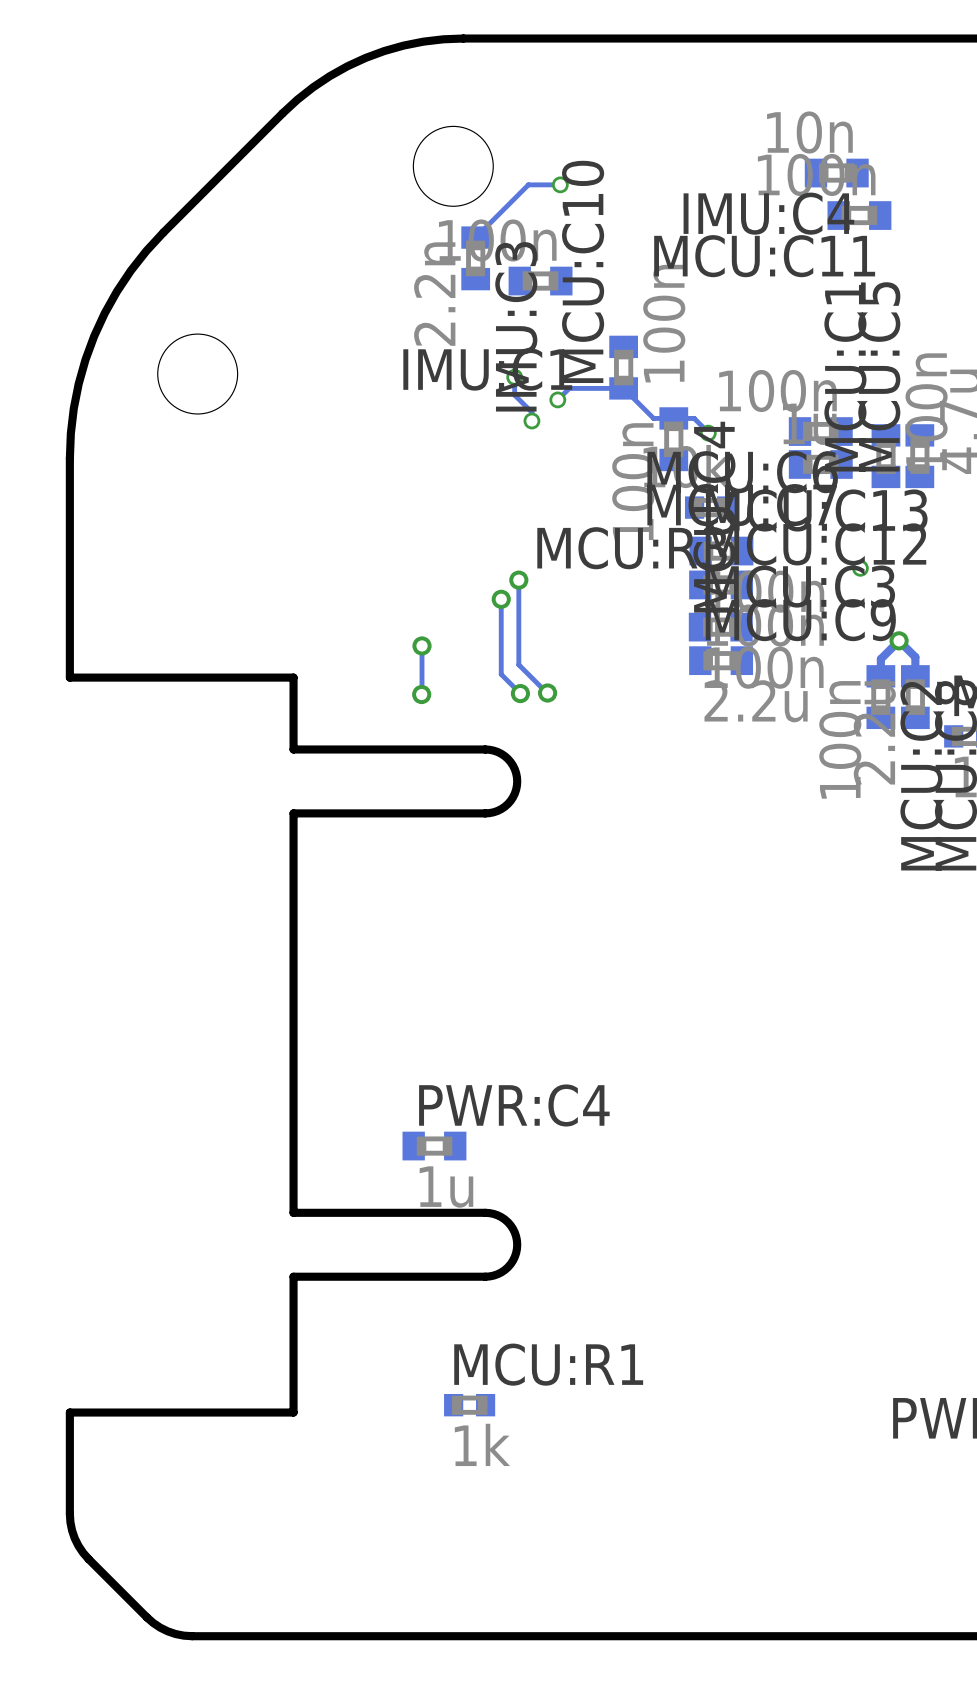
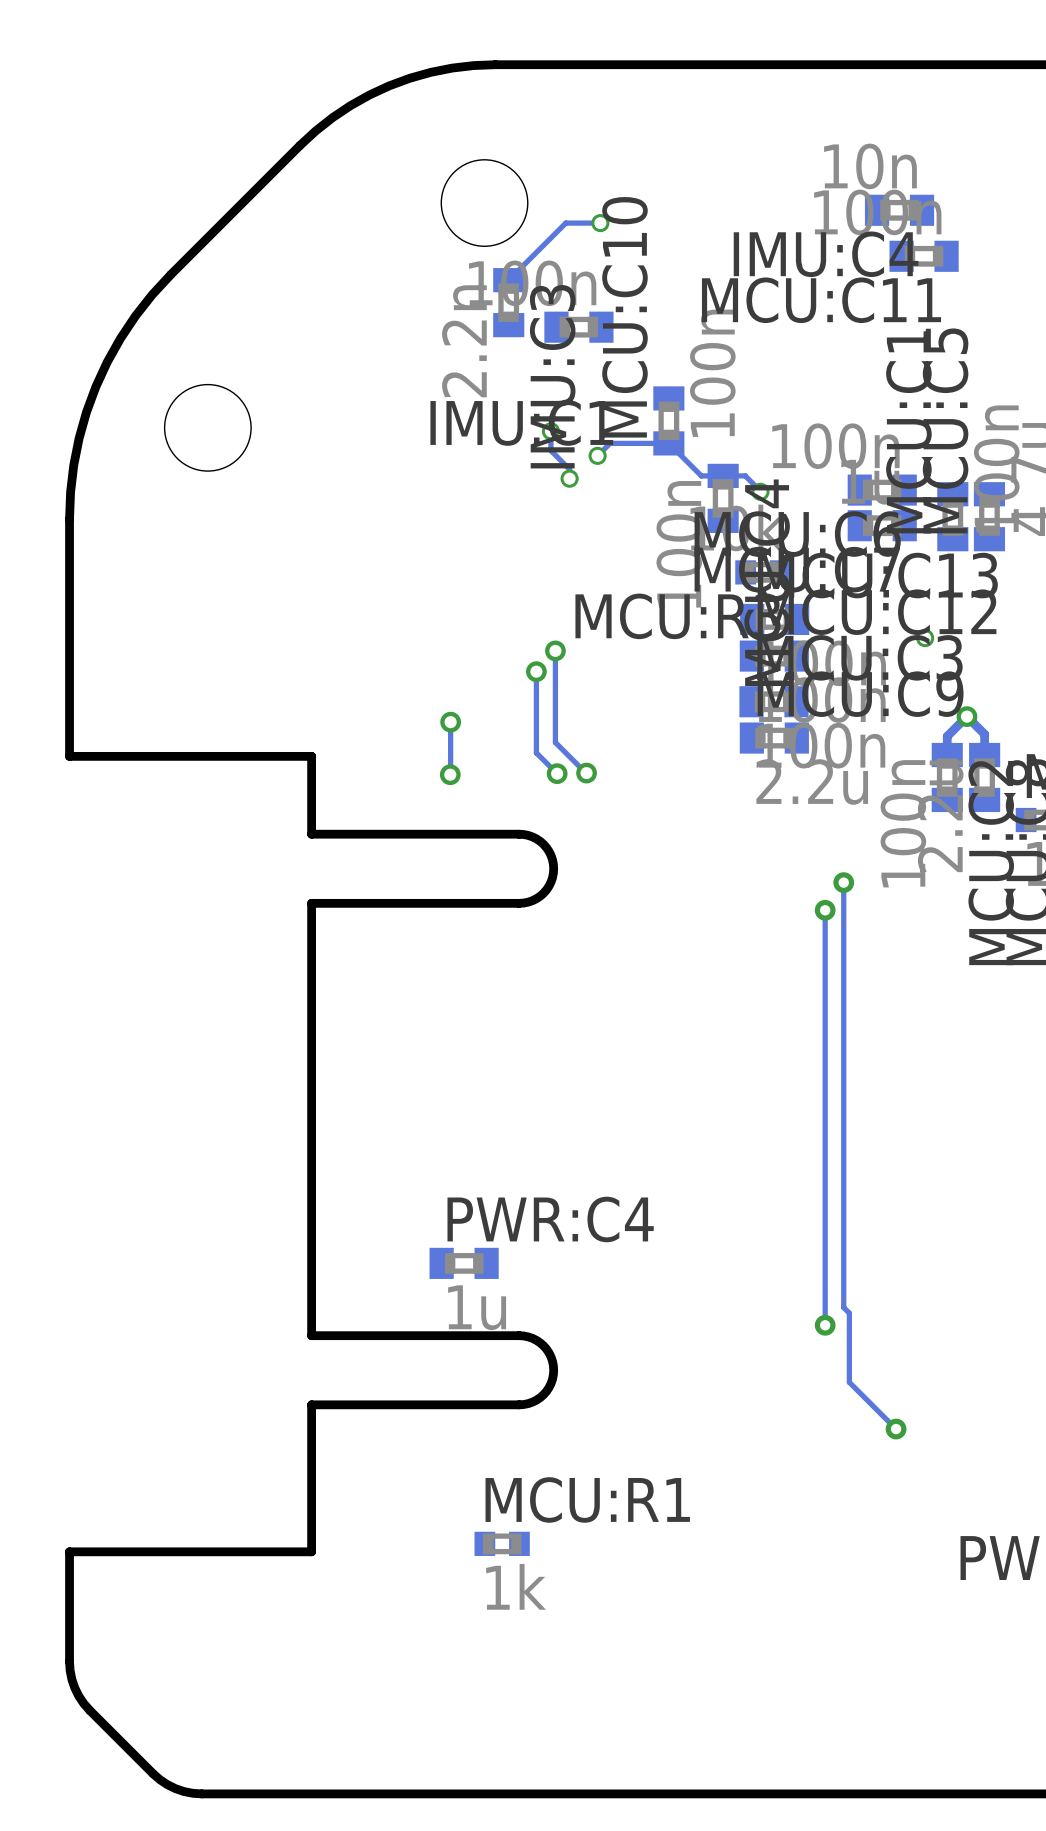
track: none -> (843, 882) (843, 1307) (849, 1313) (849, 1382) (896, 1429)
via: none -> (843, 882)
track: none -> (825, 910) (825, 1325)
via: none -> (825, 910)
via: none -> (825, 1325)
via: none -> (896, 1429)

